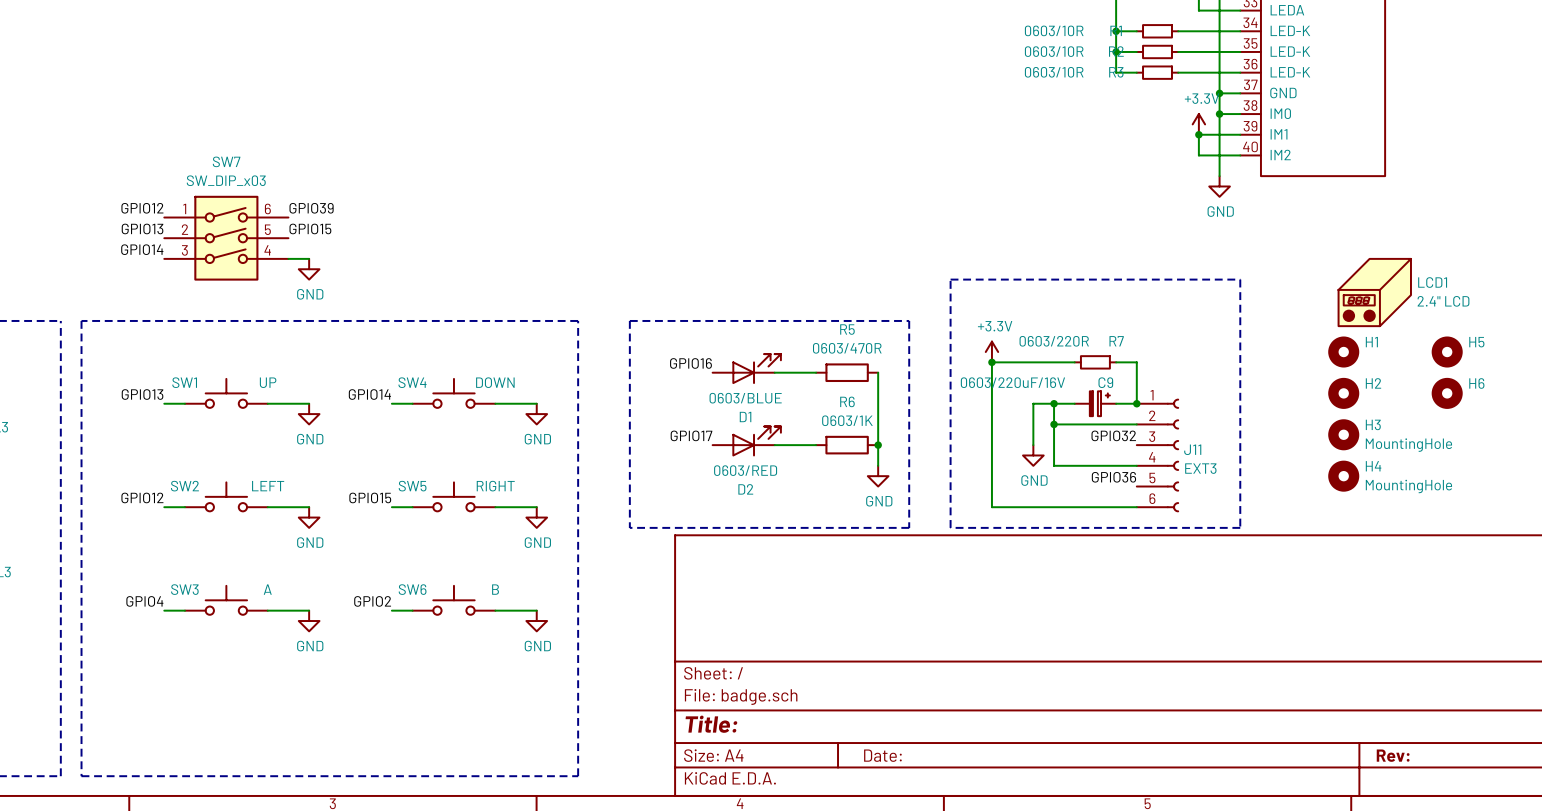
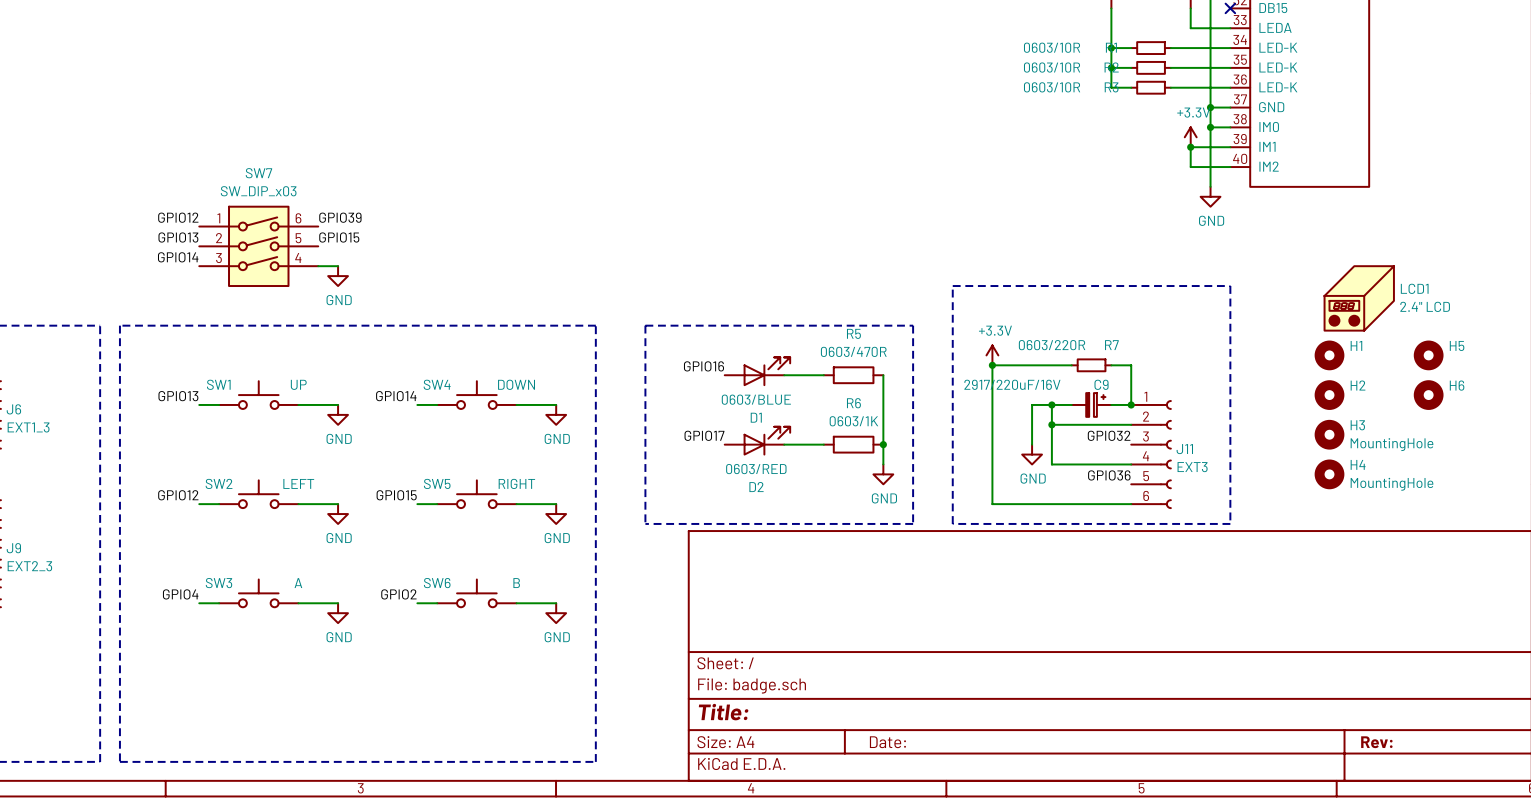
C9 value: 0603/220uF/16V (1012, 382) -> 2917/220uF/16V (1012, 384)

